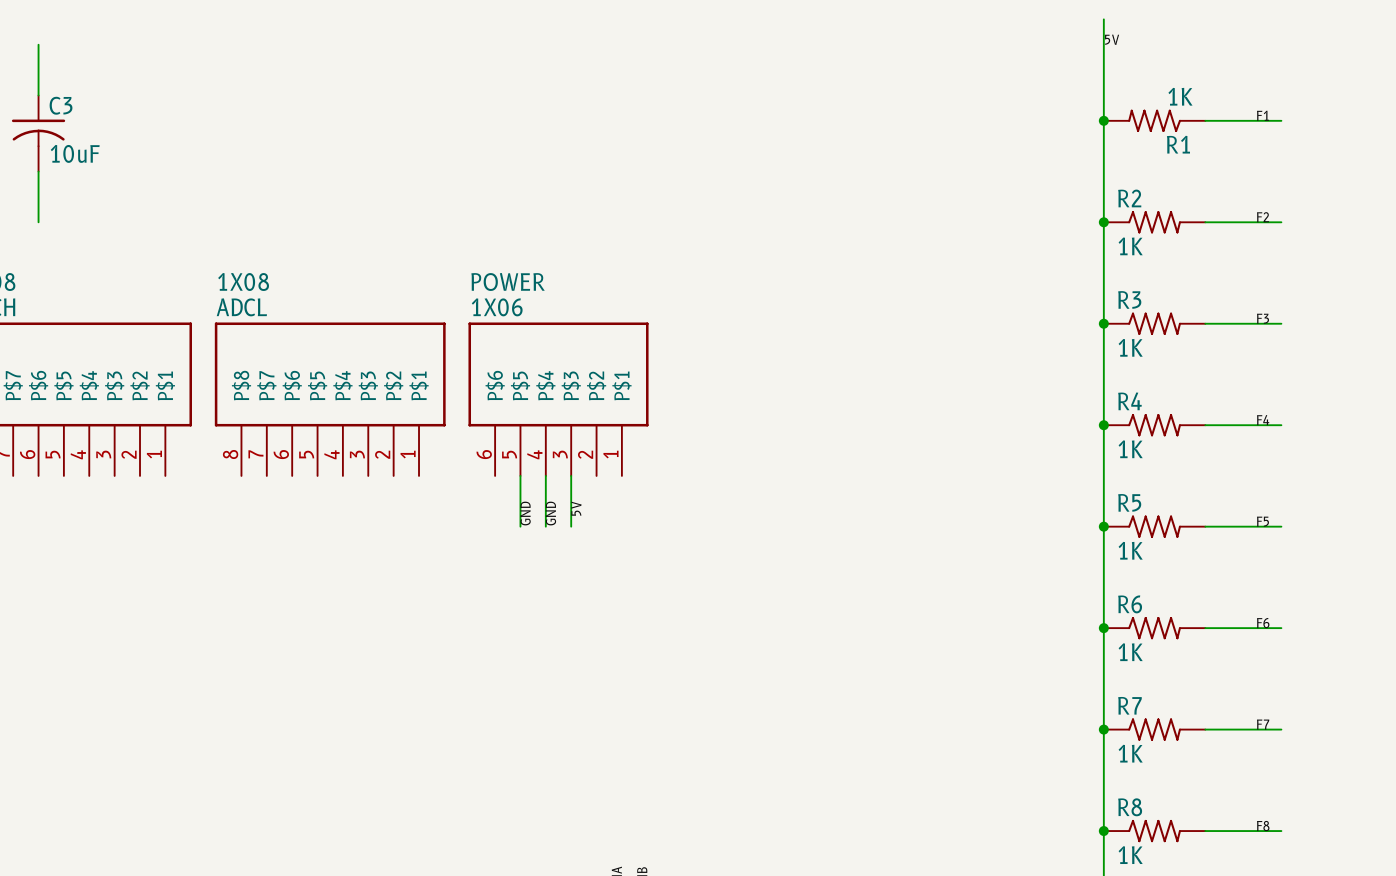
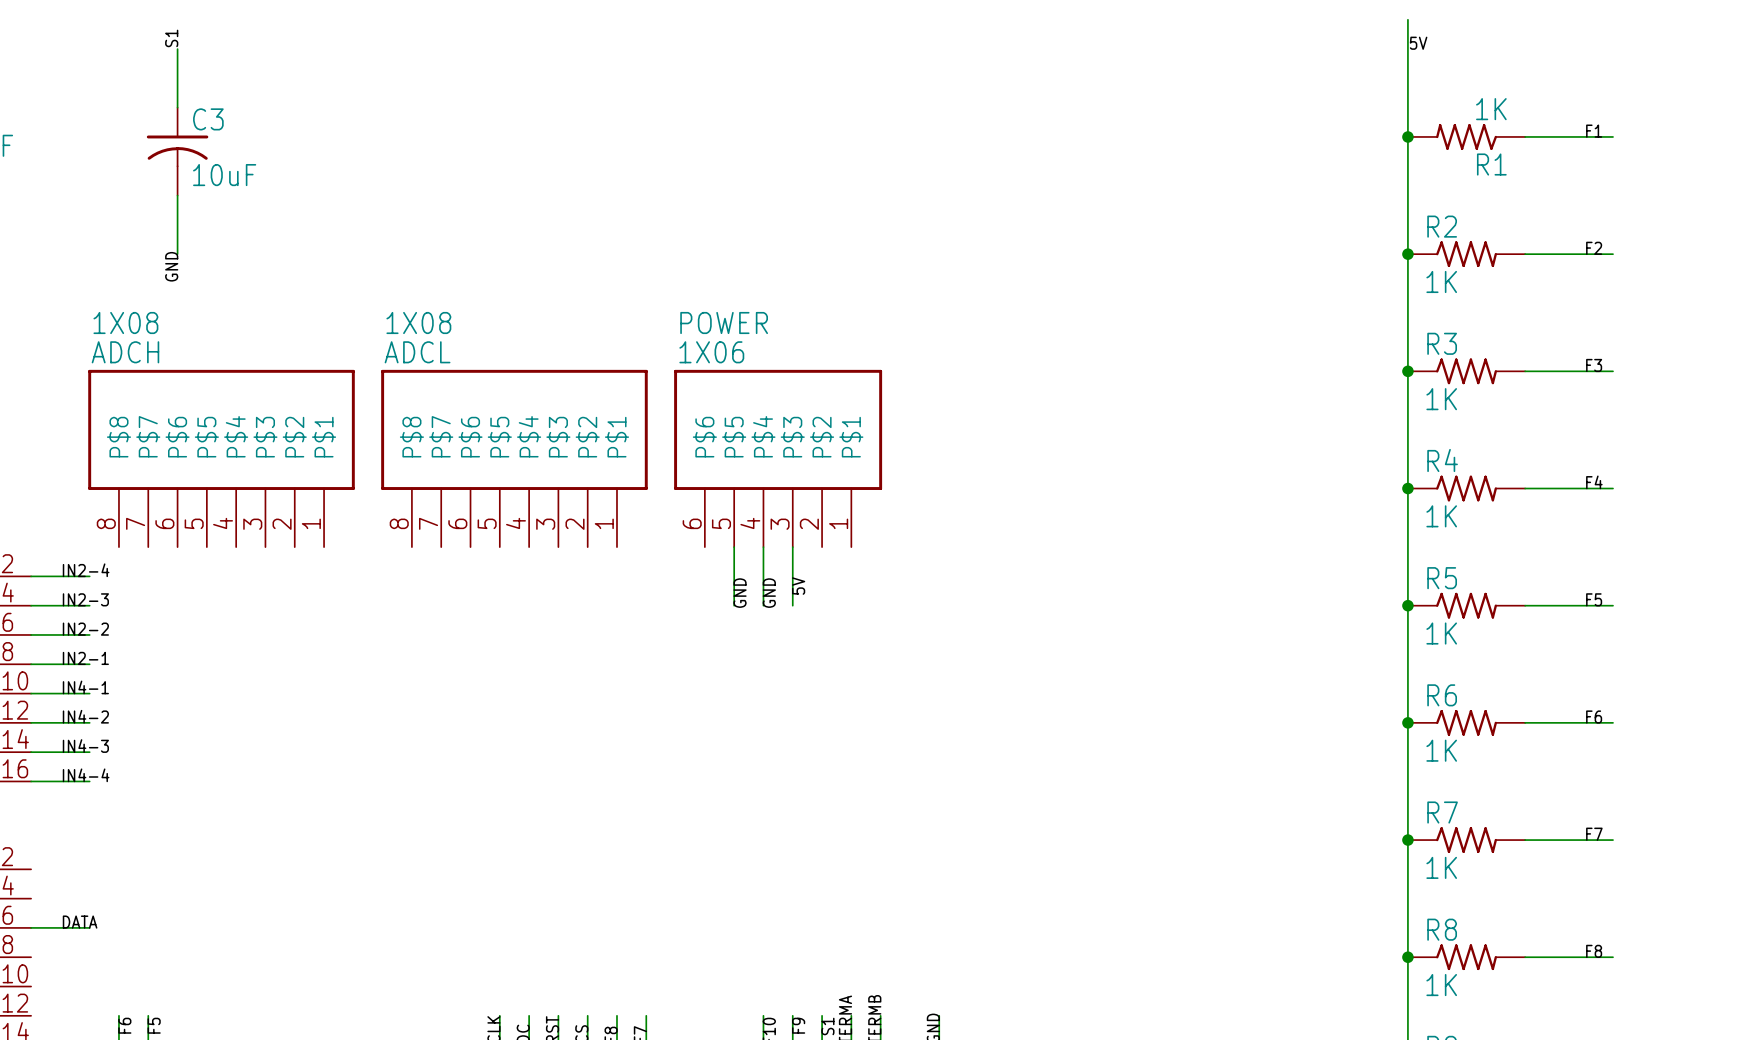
label: none -> S1 (171, 38)
label: none -> GND (171, 266)

